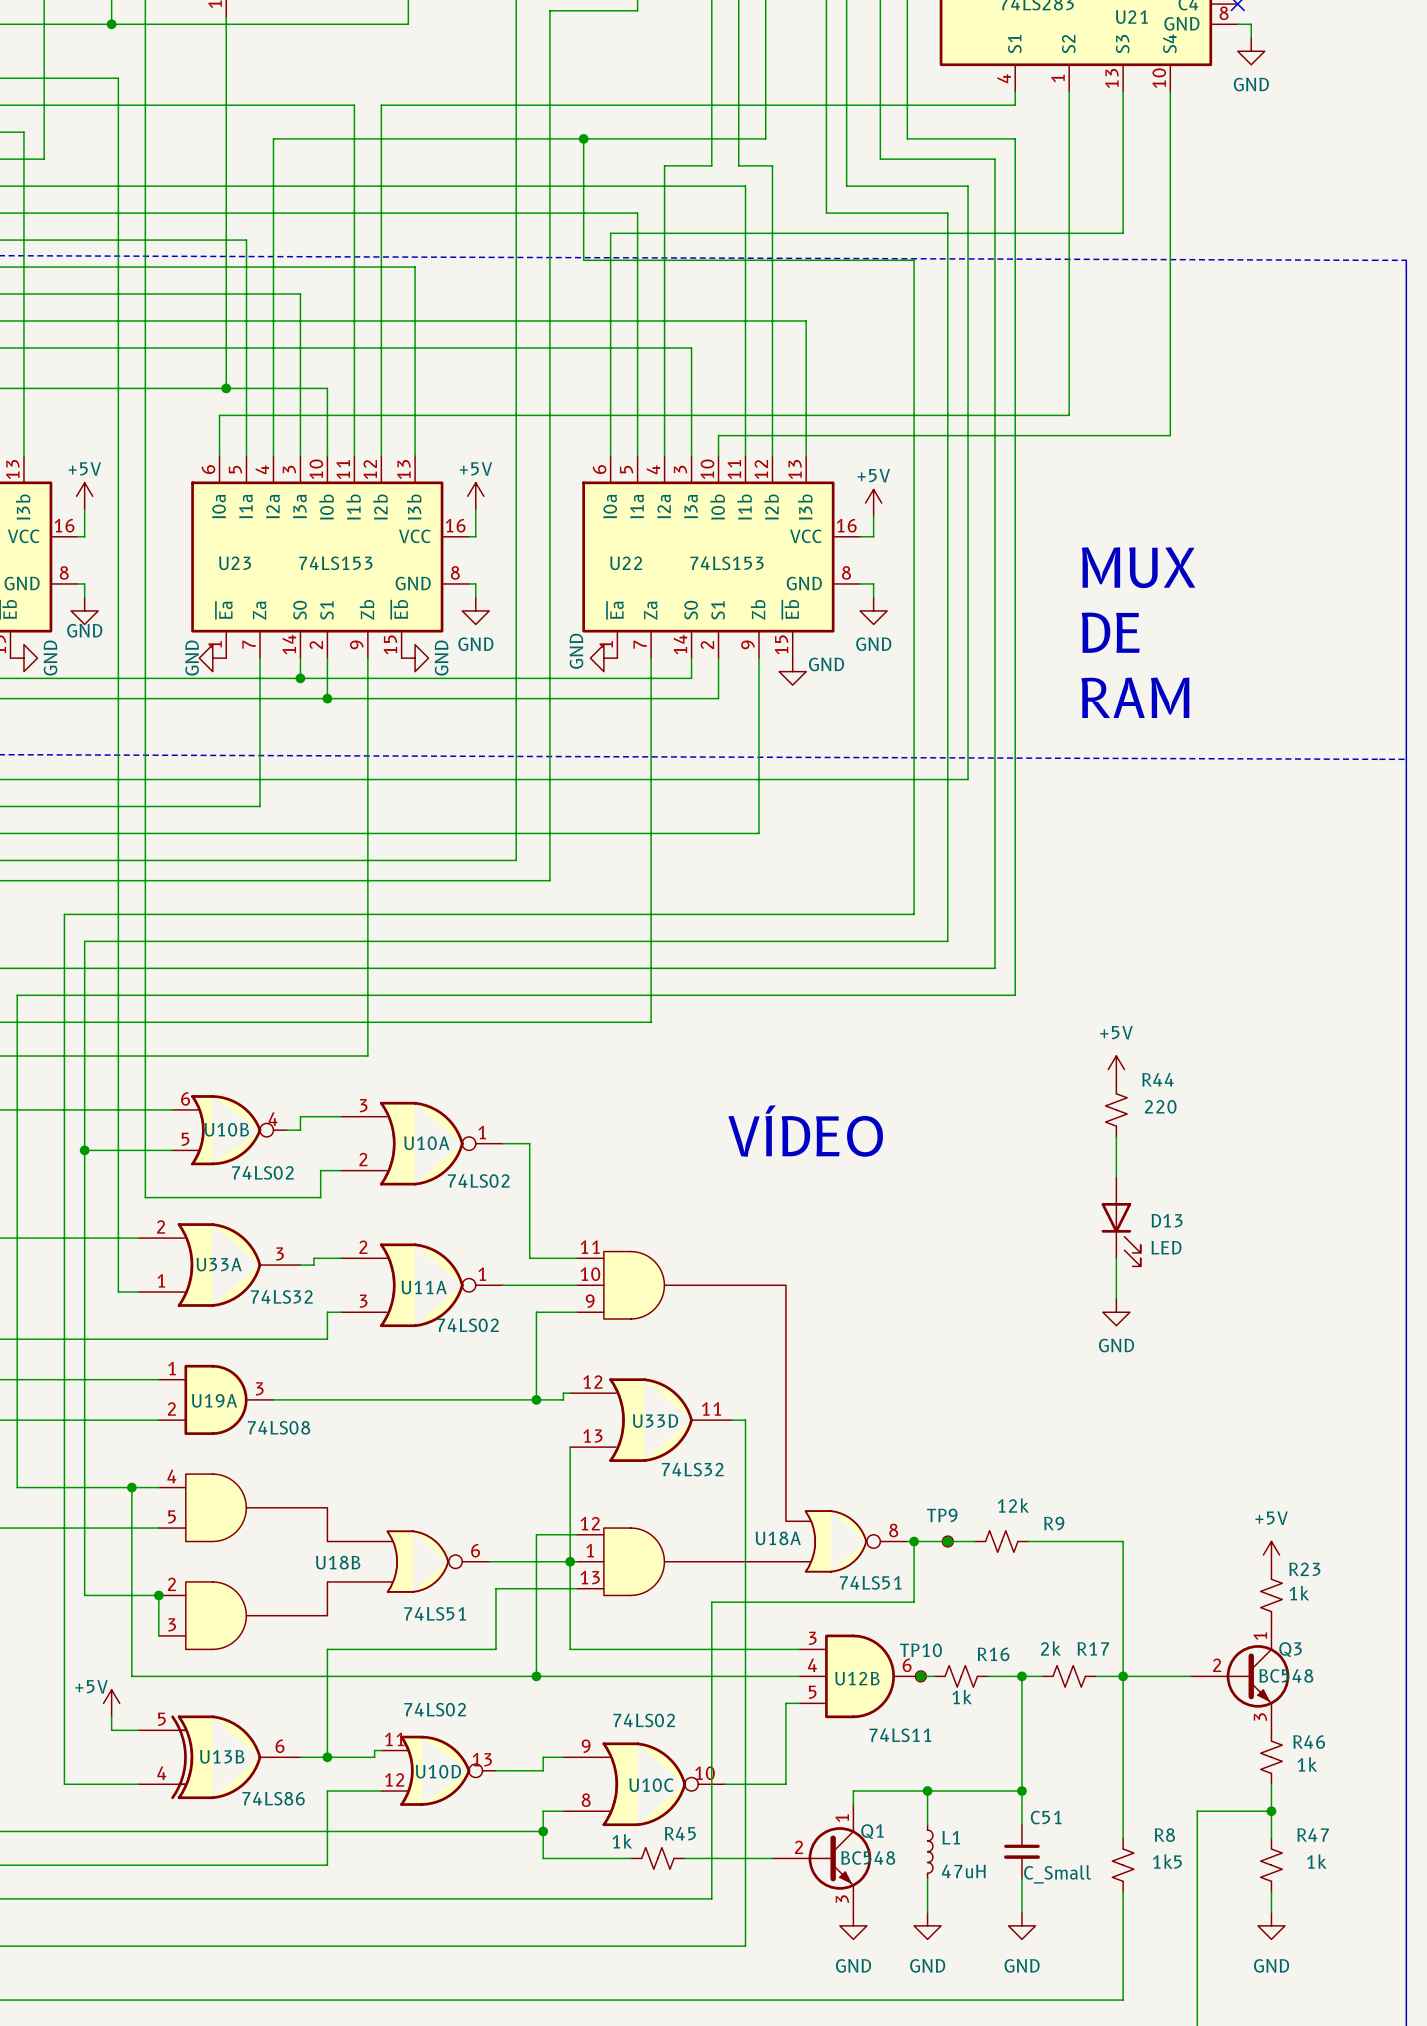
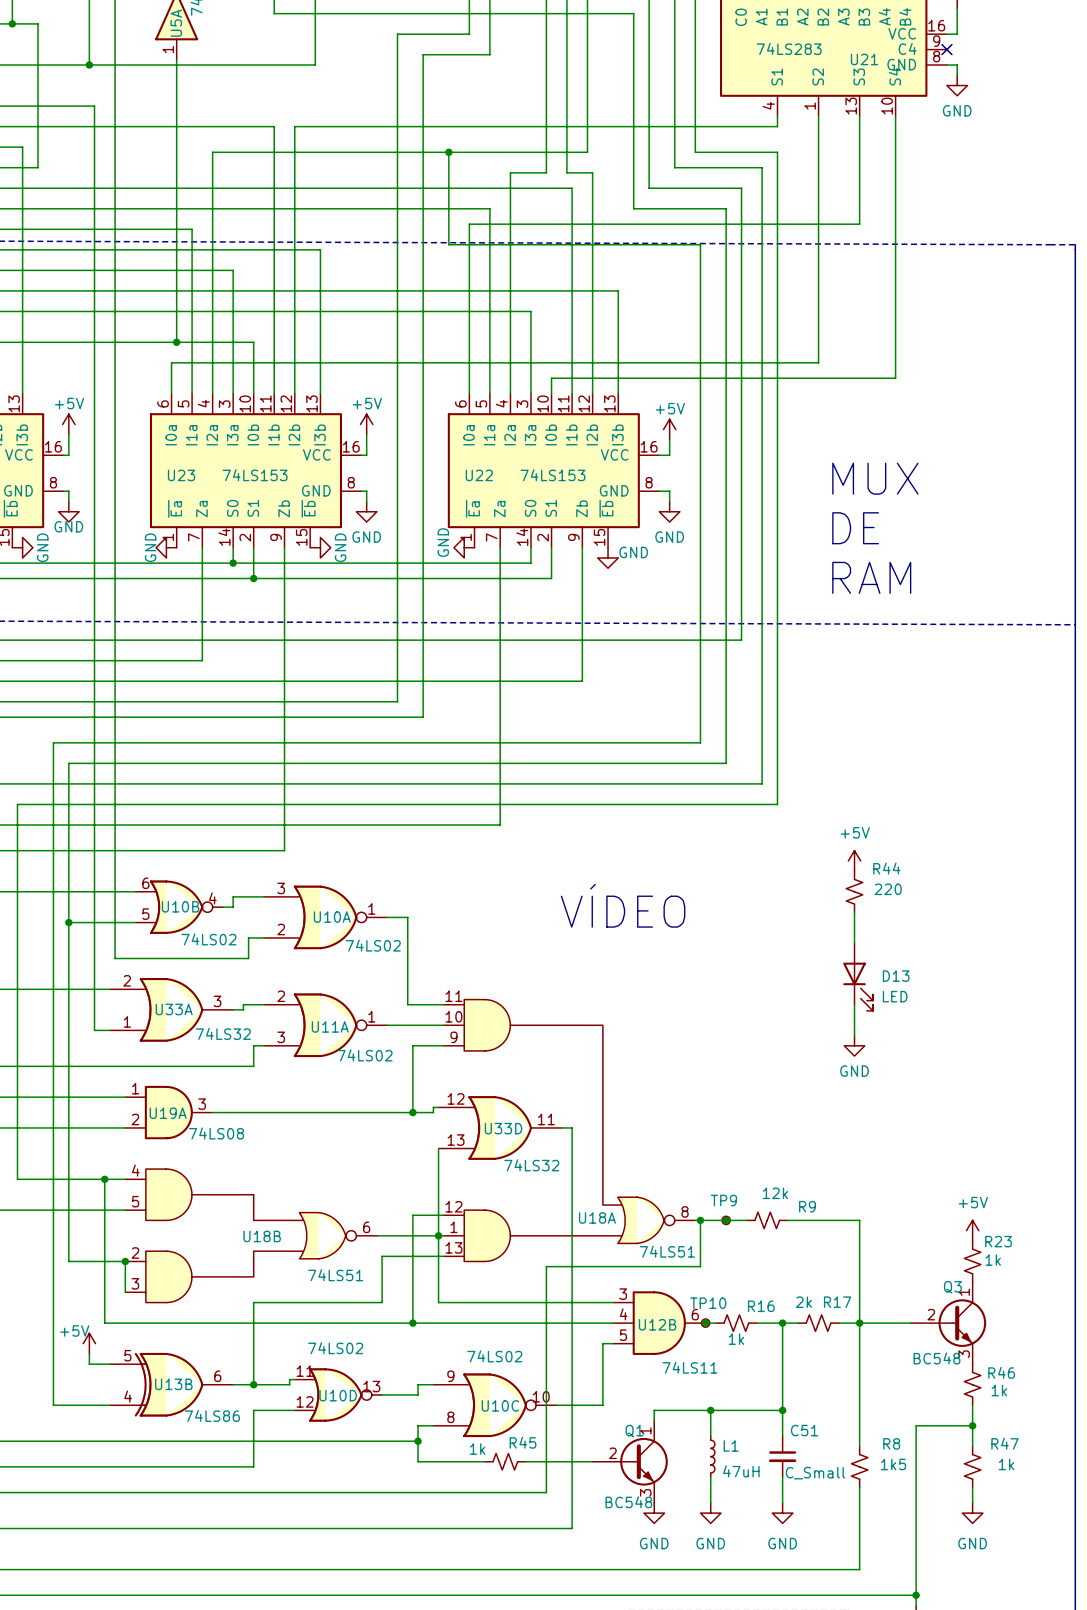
Q3 name position: Q3 (1290, 1649) -> Q3 (952, 1287)
Q3 value position: BC548 (1286, 1675) -> BC548 (936, 1358)
Q1 name position: Q1 (872, 1831) -> Q1 (634, 1431)
Q1 value position: BC548 (868, 1858) -> BC548 (628, 1502)

